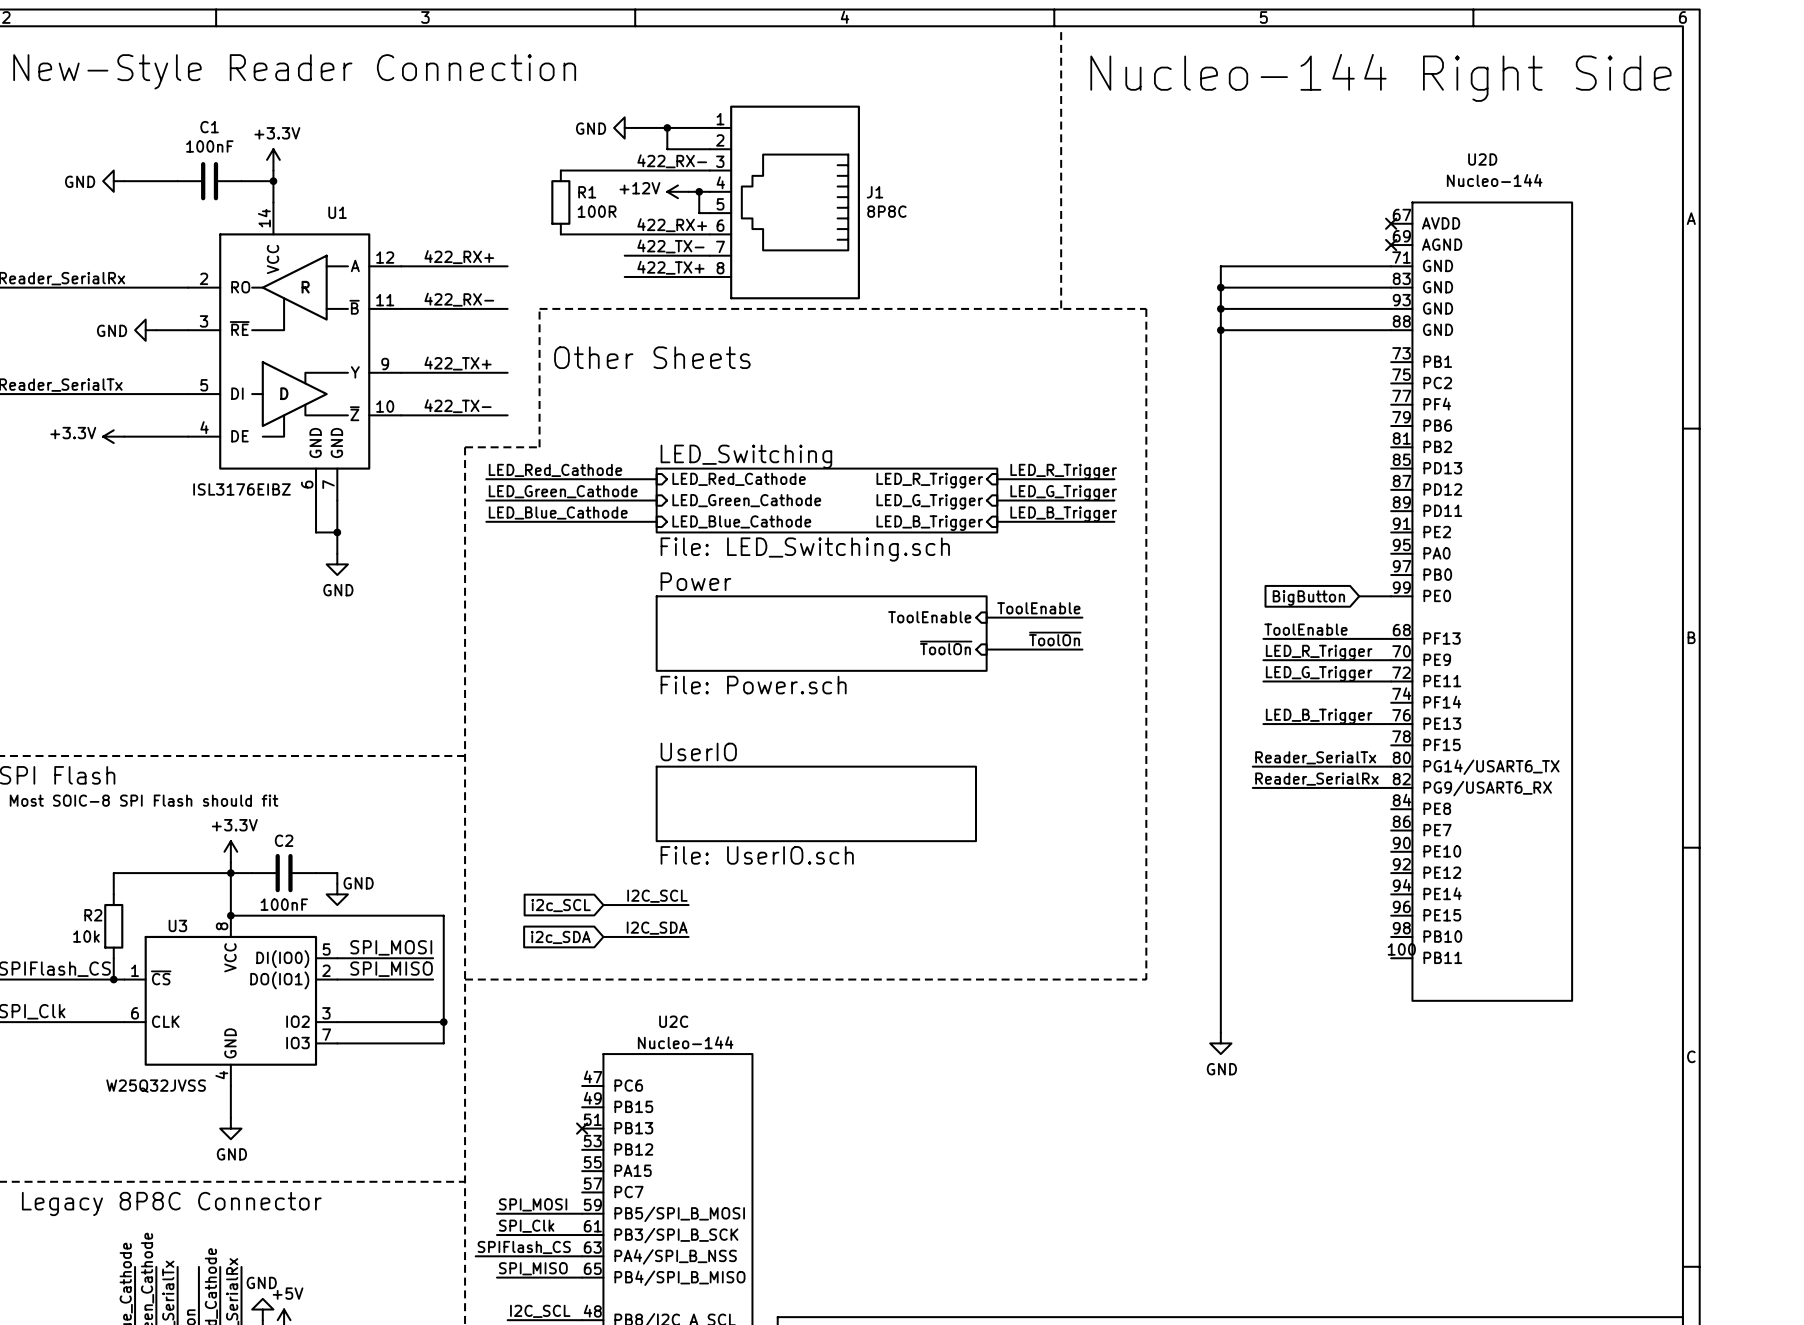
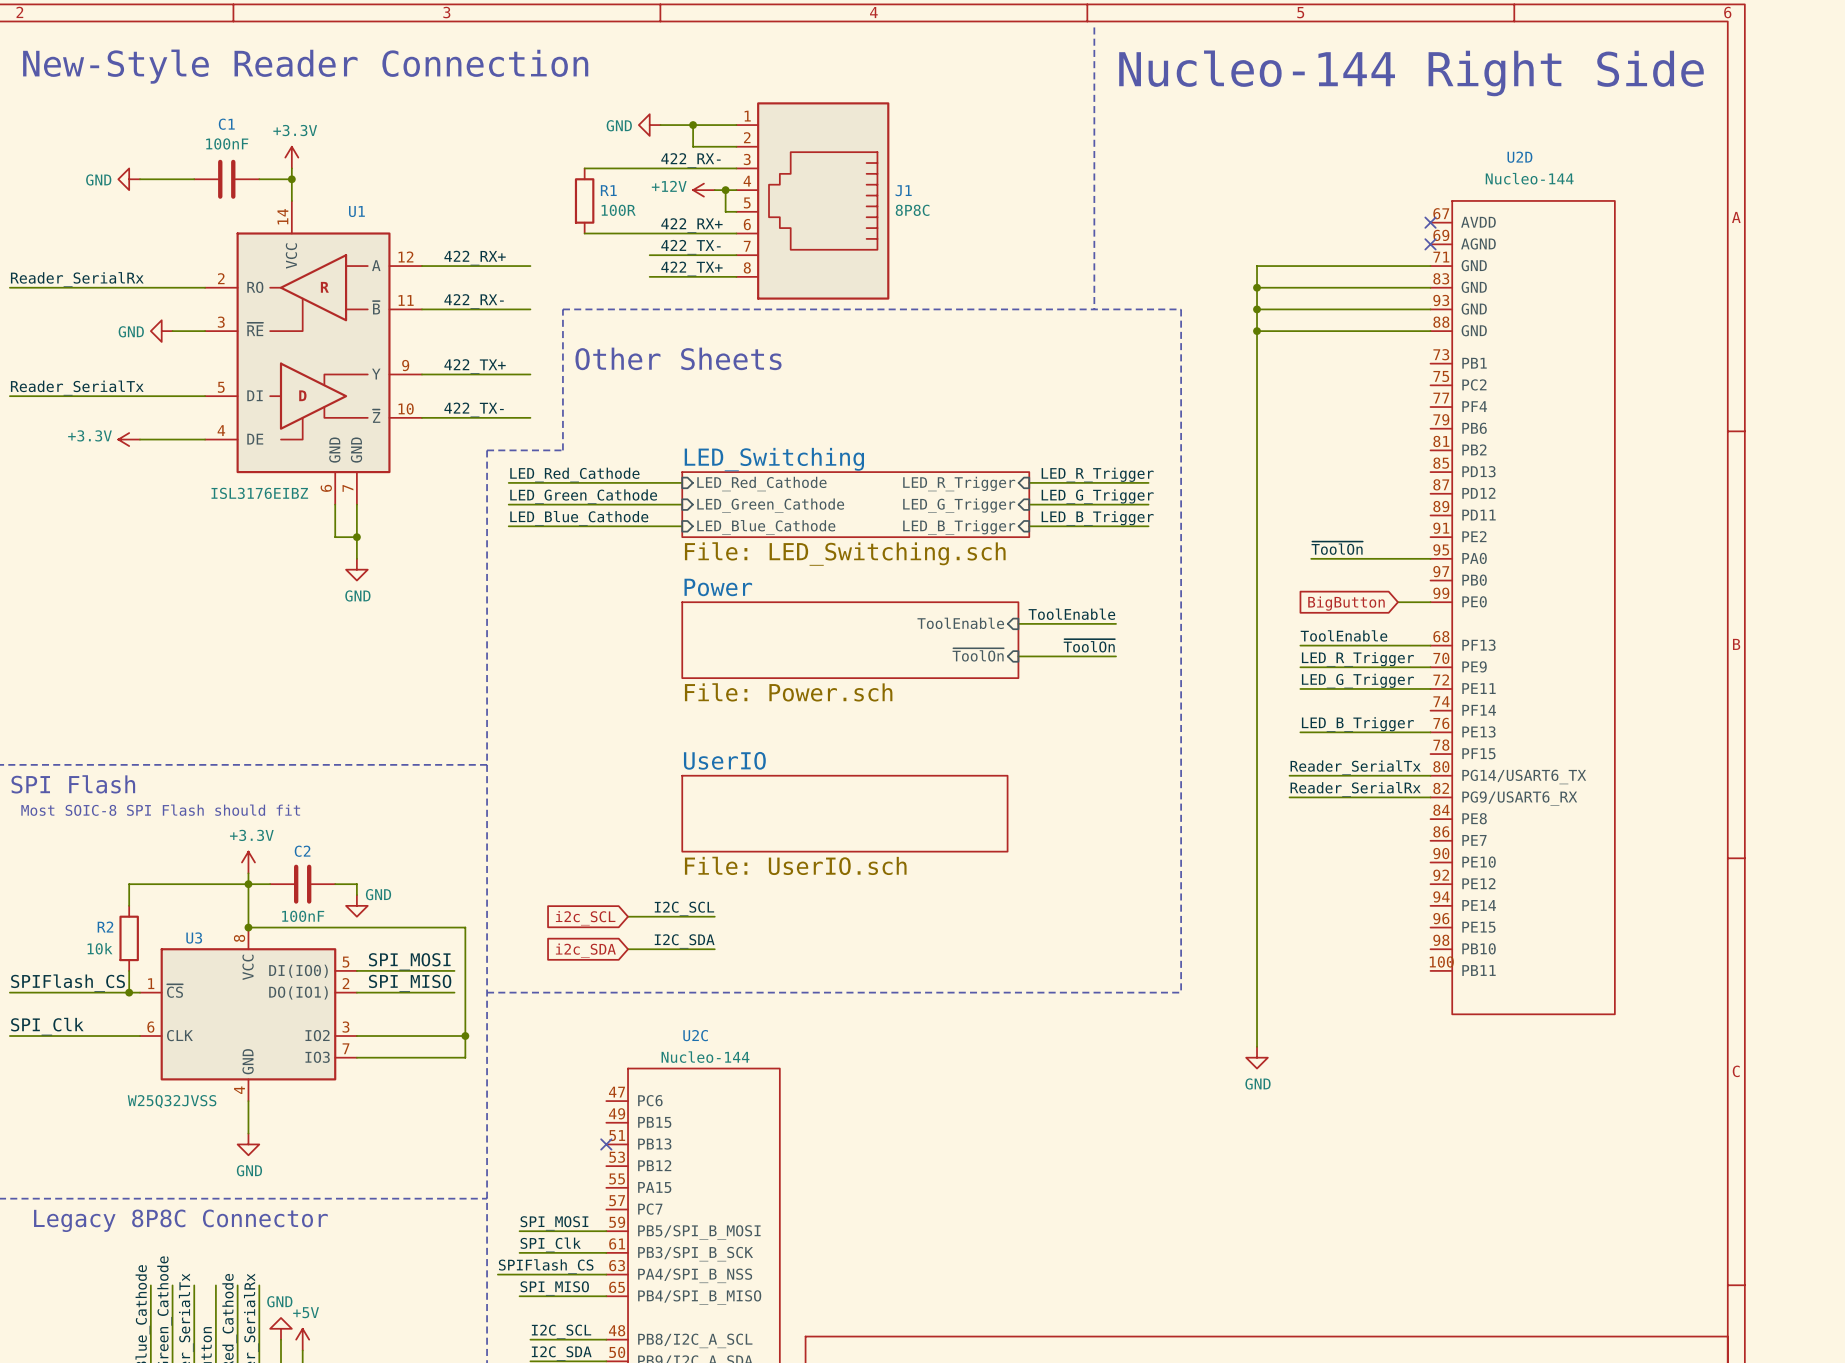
label: none -> ~{ToolOn} (1337, 548)
wire: none -> (1311, 558) (1430, 558)

